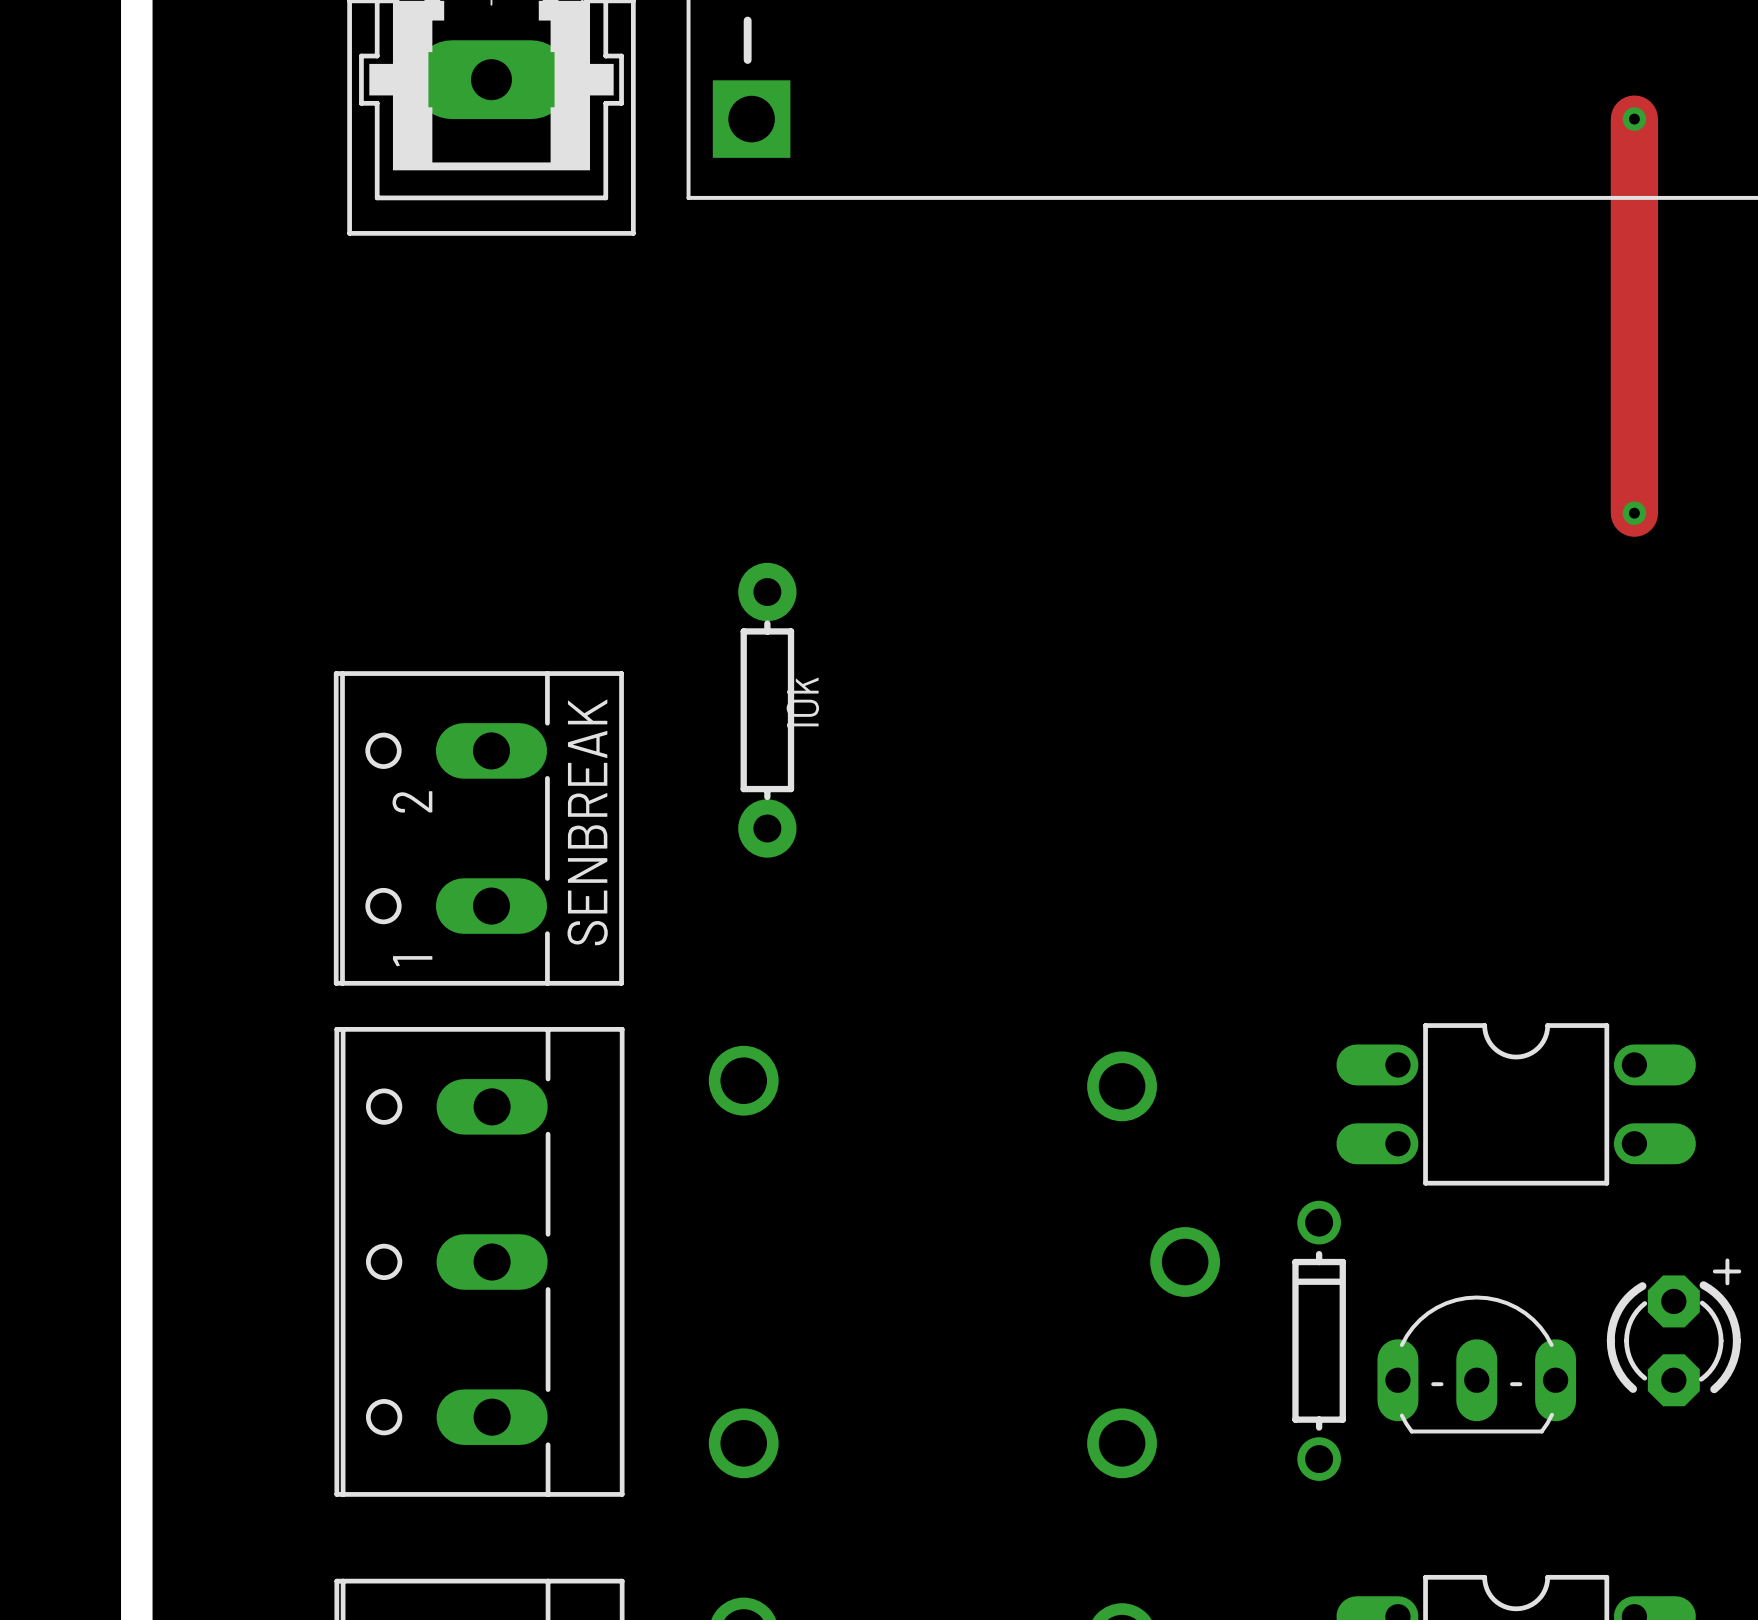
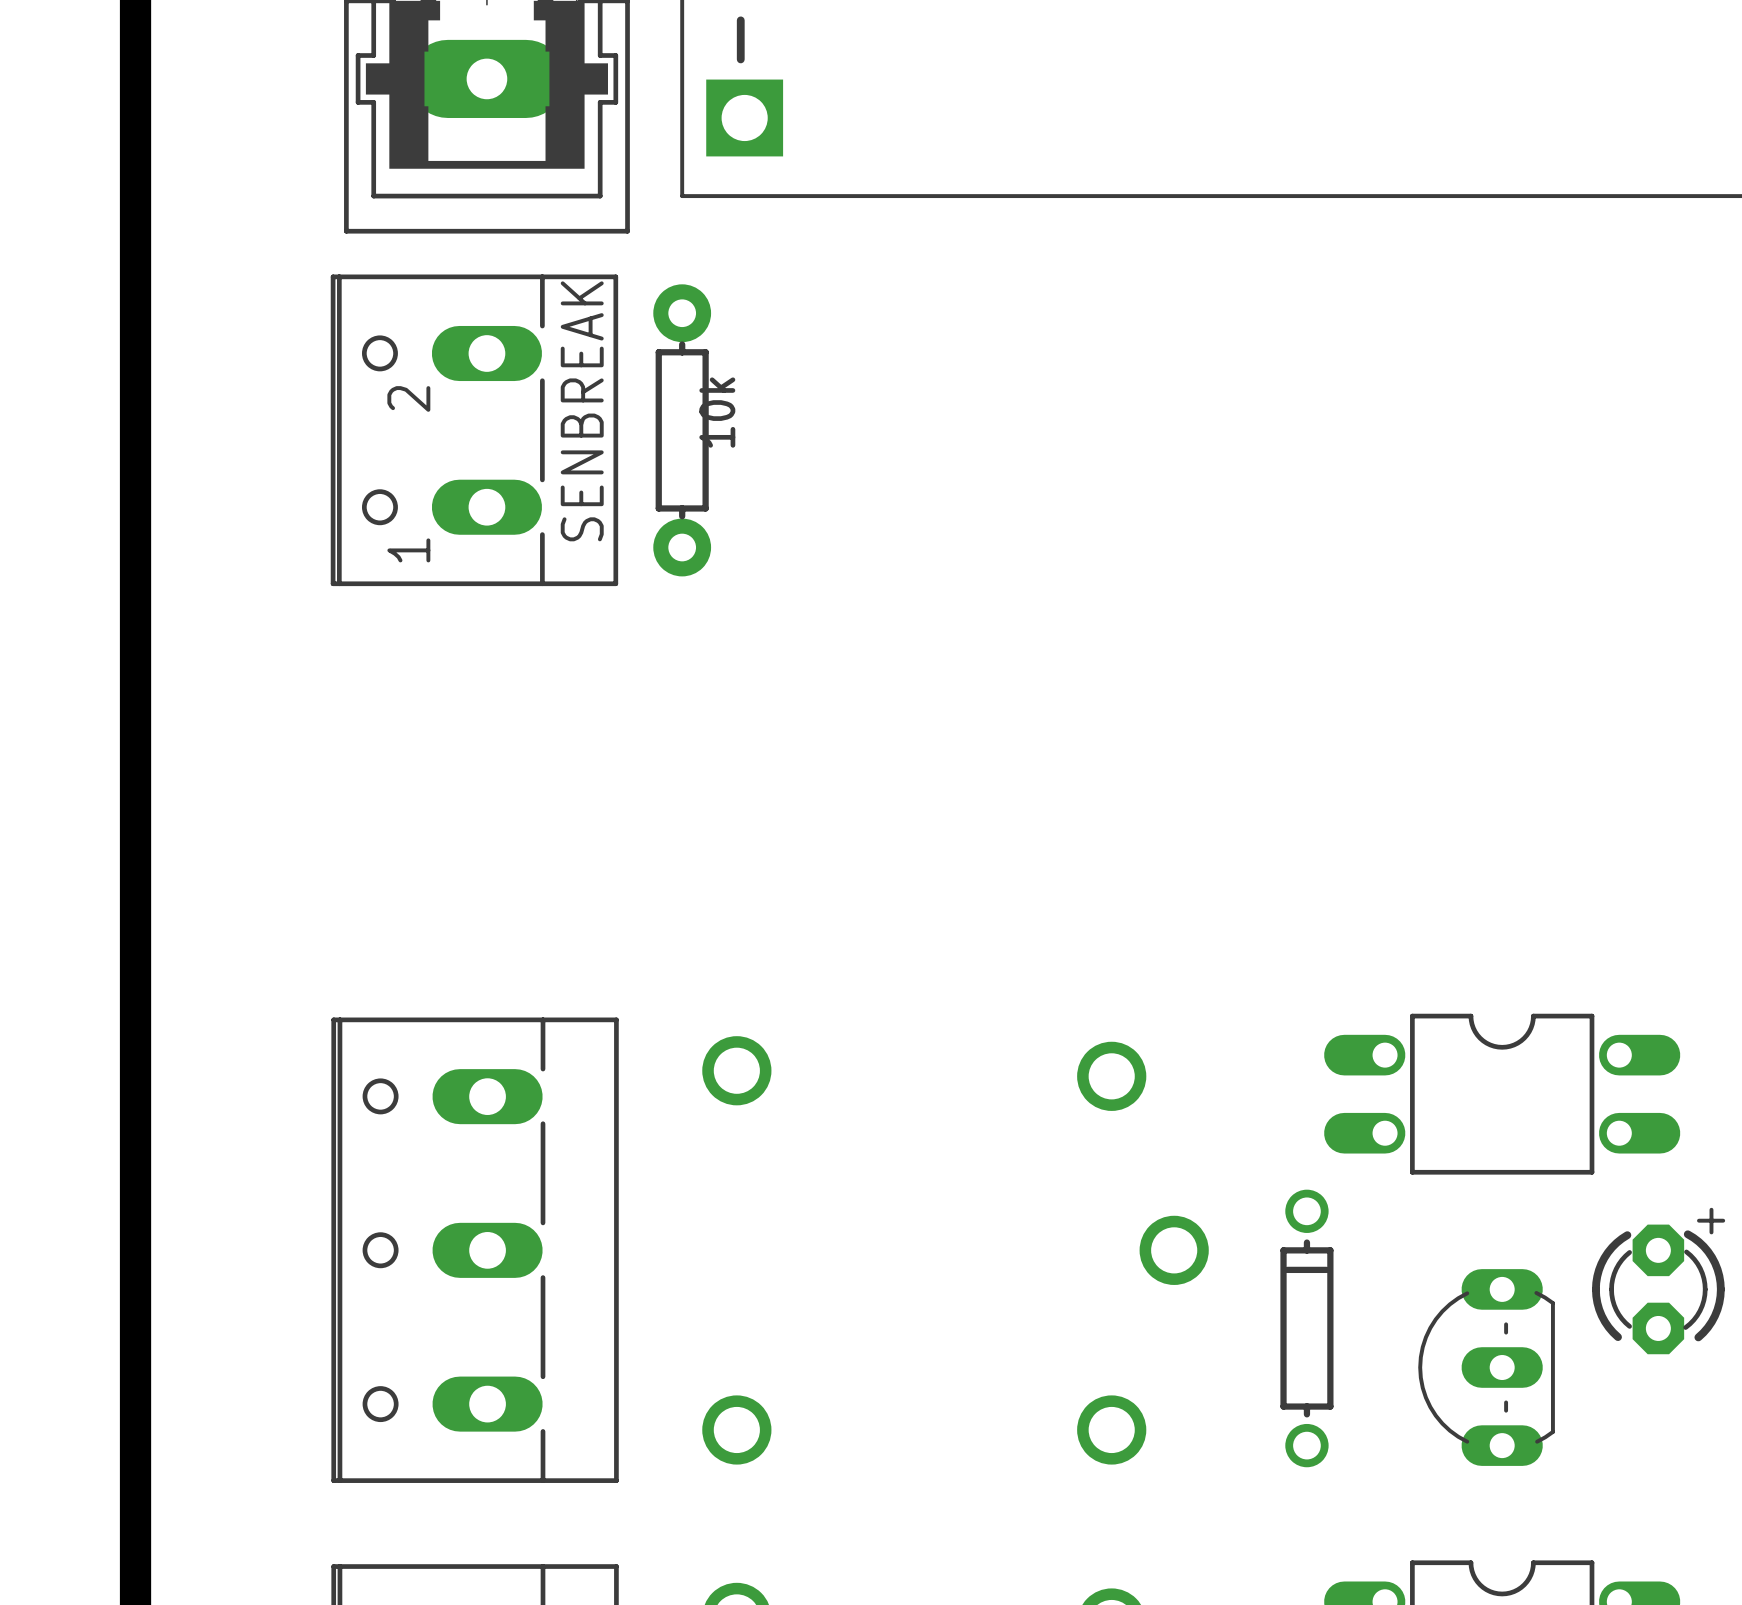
track: (1634, 119) (1634, 513) -> none
via: (1634, 119) -> none
via: (1634, 513) -> none
part position: (767, 710) -> (682, 430)
SENBREAK position: (478, 828) -> (474, 430)
part position: (1674, 1332) -> (1658, 1281)
part rotation: 0° (1476, 1364) -> 90° counterclockwise (1486, 1367)

